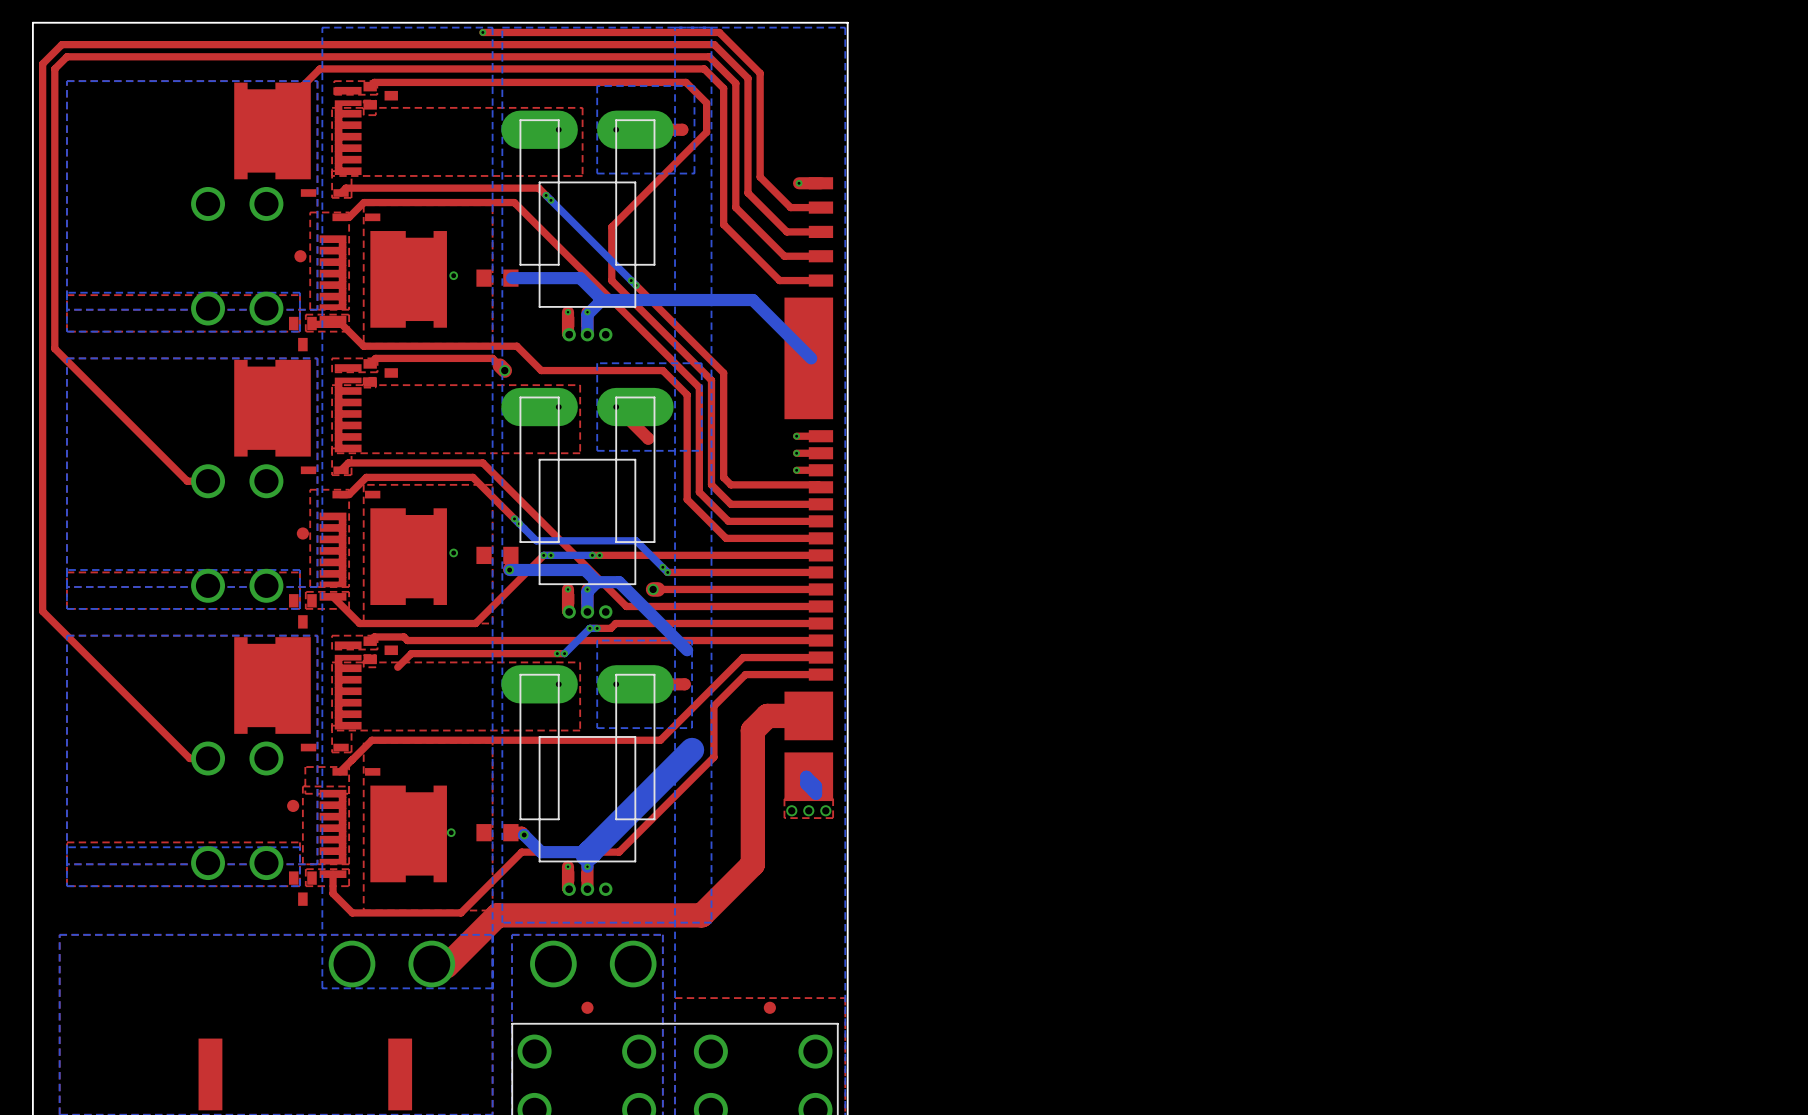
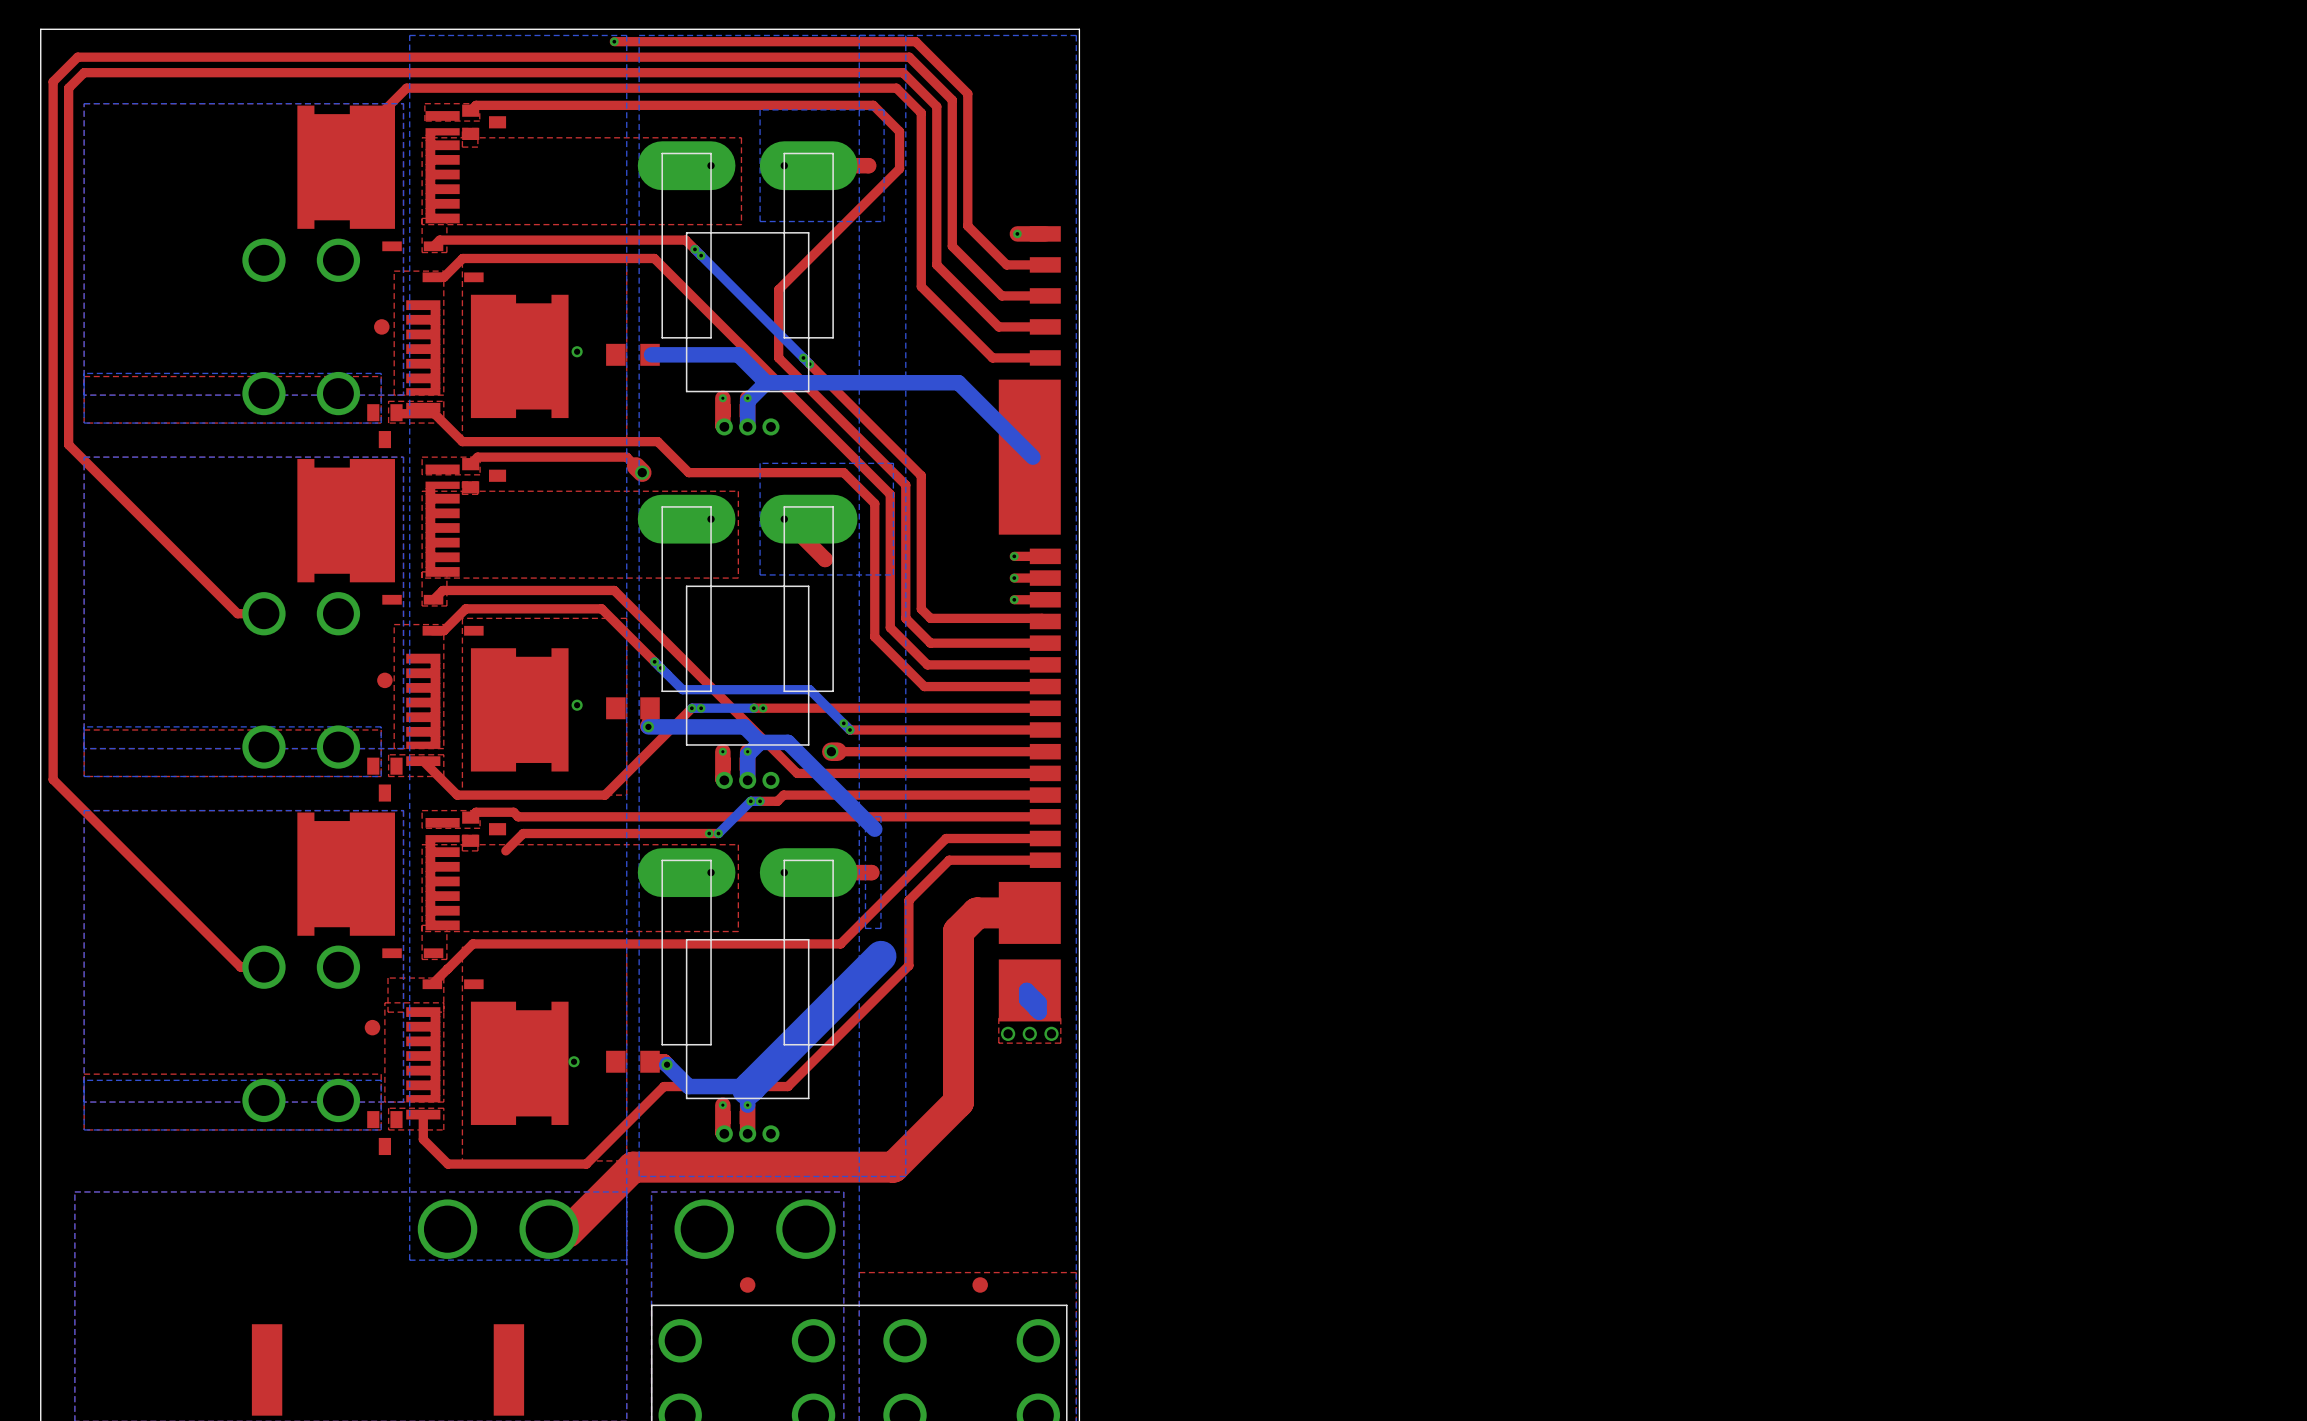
bottom zone outline: (679, 640) (597, 640) (597, 728) (679, 728) -> (865, 816) (865, 928)

